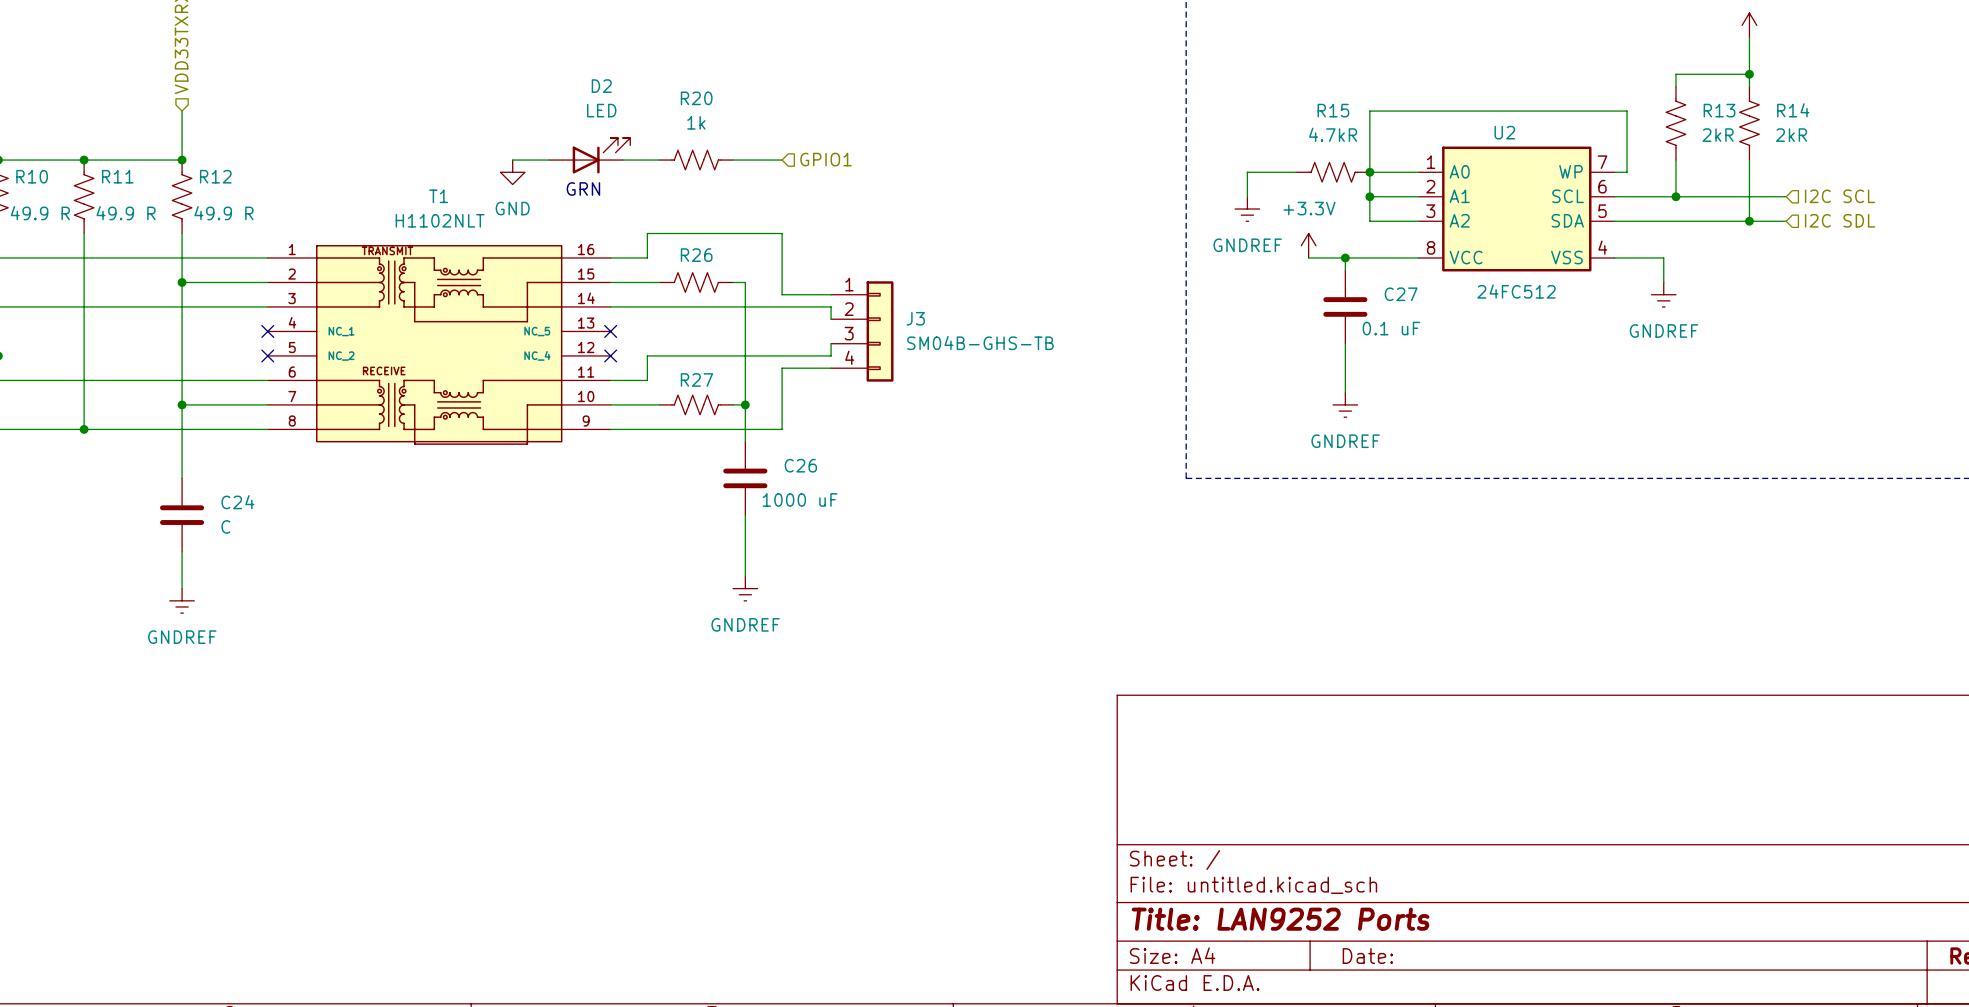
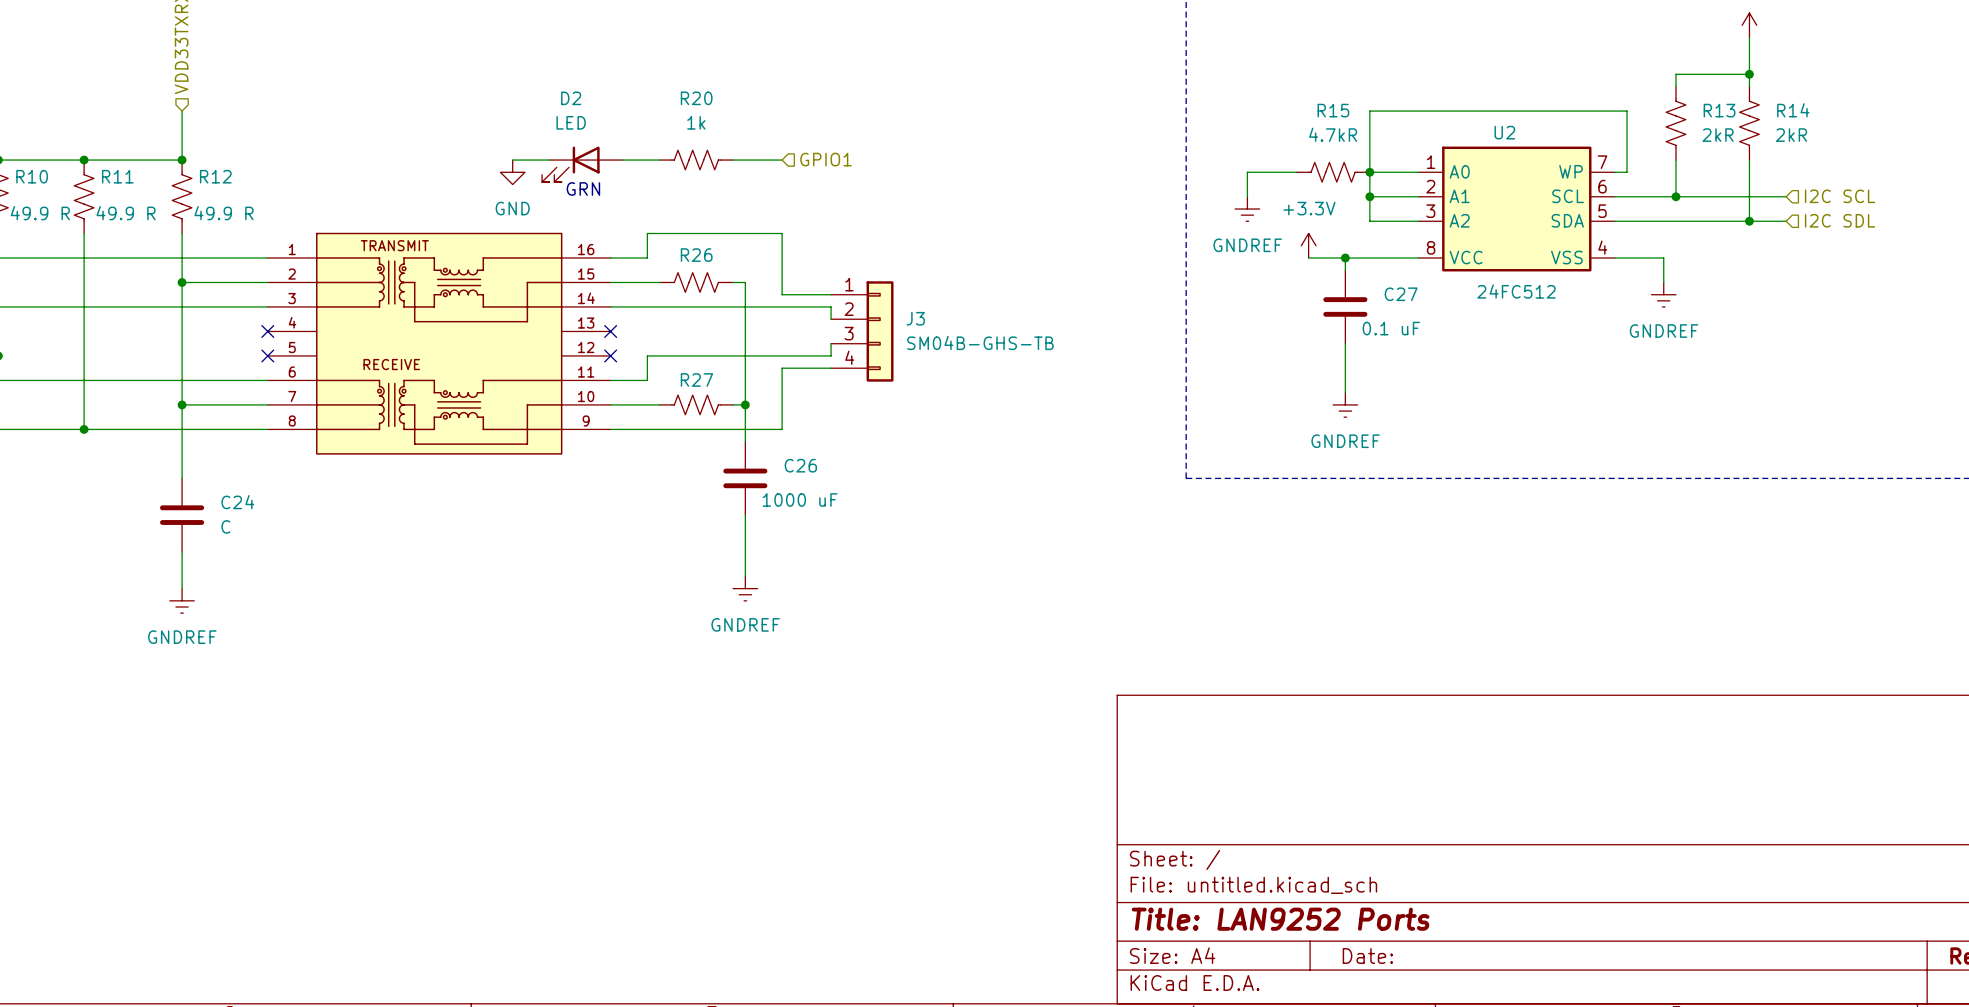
D2 name position: D2 (601, 86) -> D2 (571, 98)
D2 value position: LED (601, 110) -> LED (571, 122)
D2 rotation: 0° (601, 155) -> 180° (570, 164)
part: none -> (439, 343)
T1: H1102NLT (439, 344) -> none

